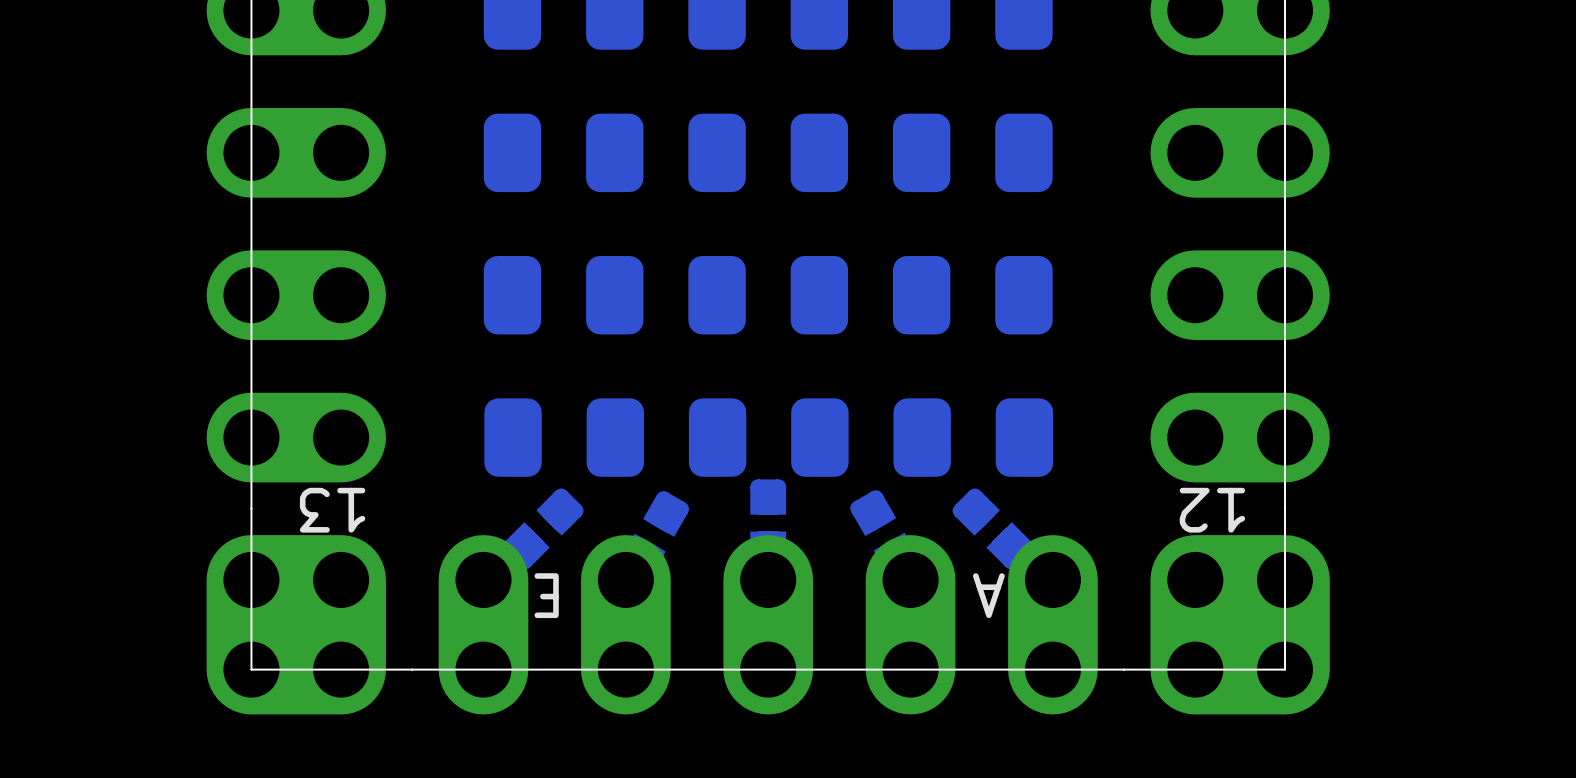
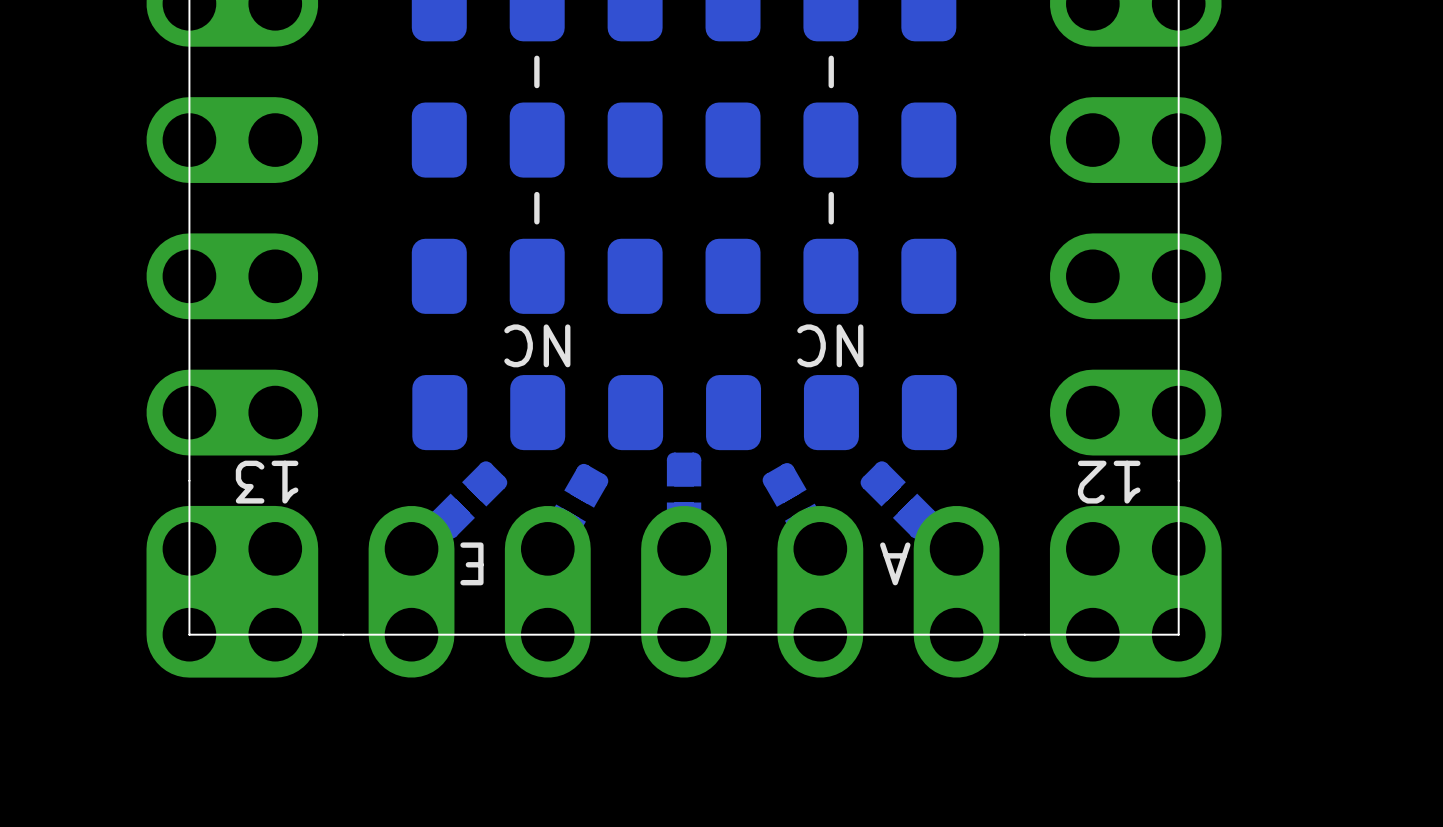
line: none -> (536, 58) (536, 85)
line: none -> (831, 58) (831, 85)
line: none -> (536, 194) (536, 221)
line: none -> (831, 194) (831, 221)
text: none -> NC (537, 345)
text: none -> NC (830, 345)

